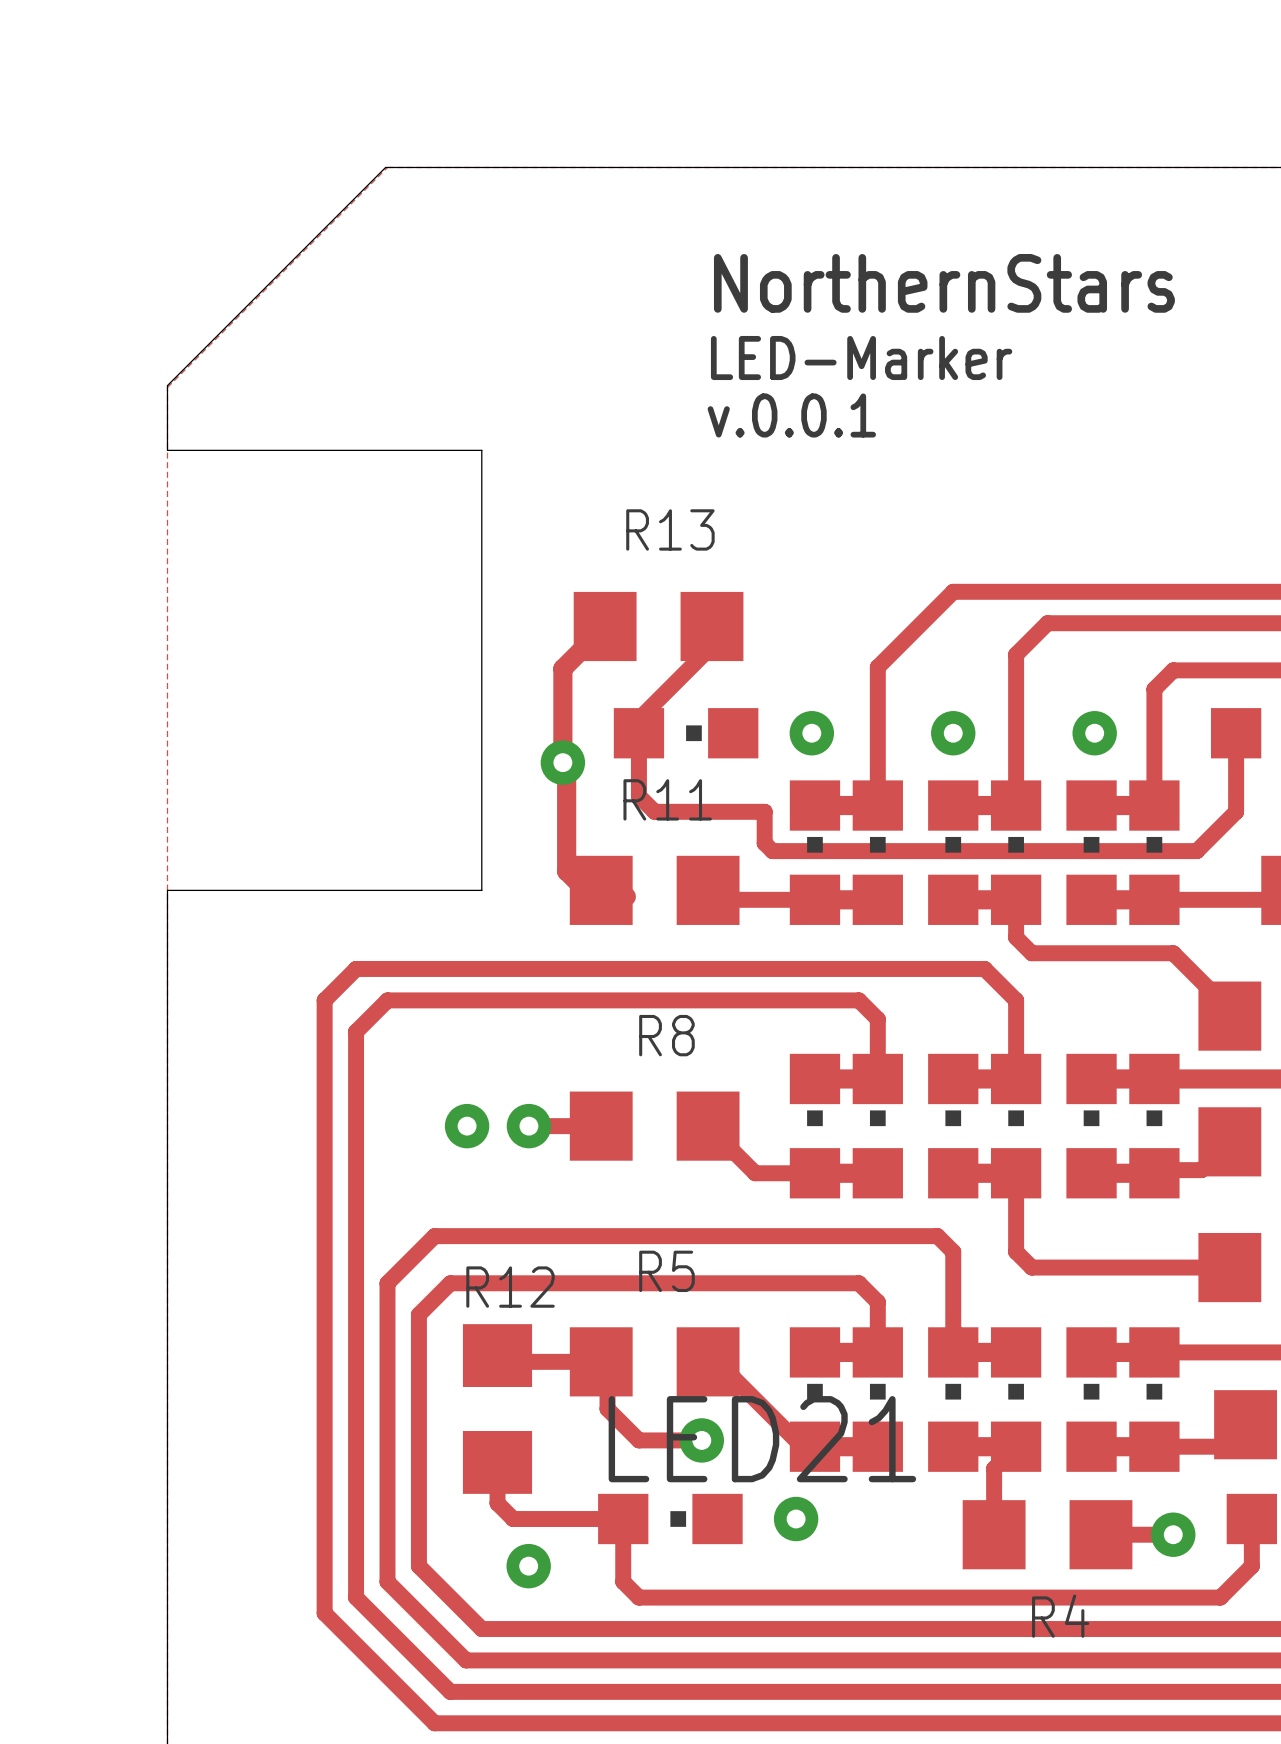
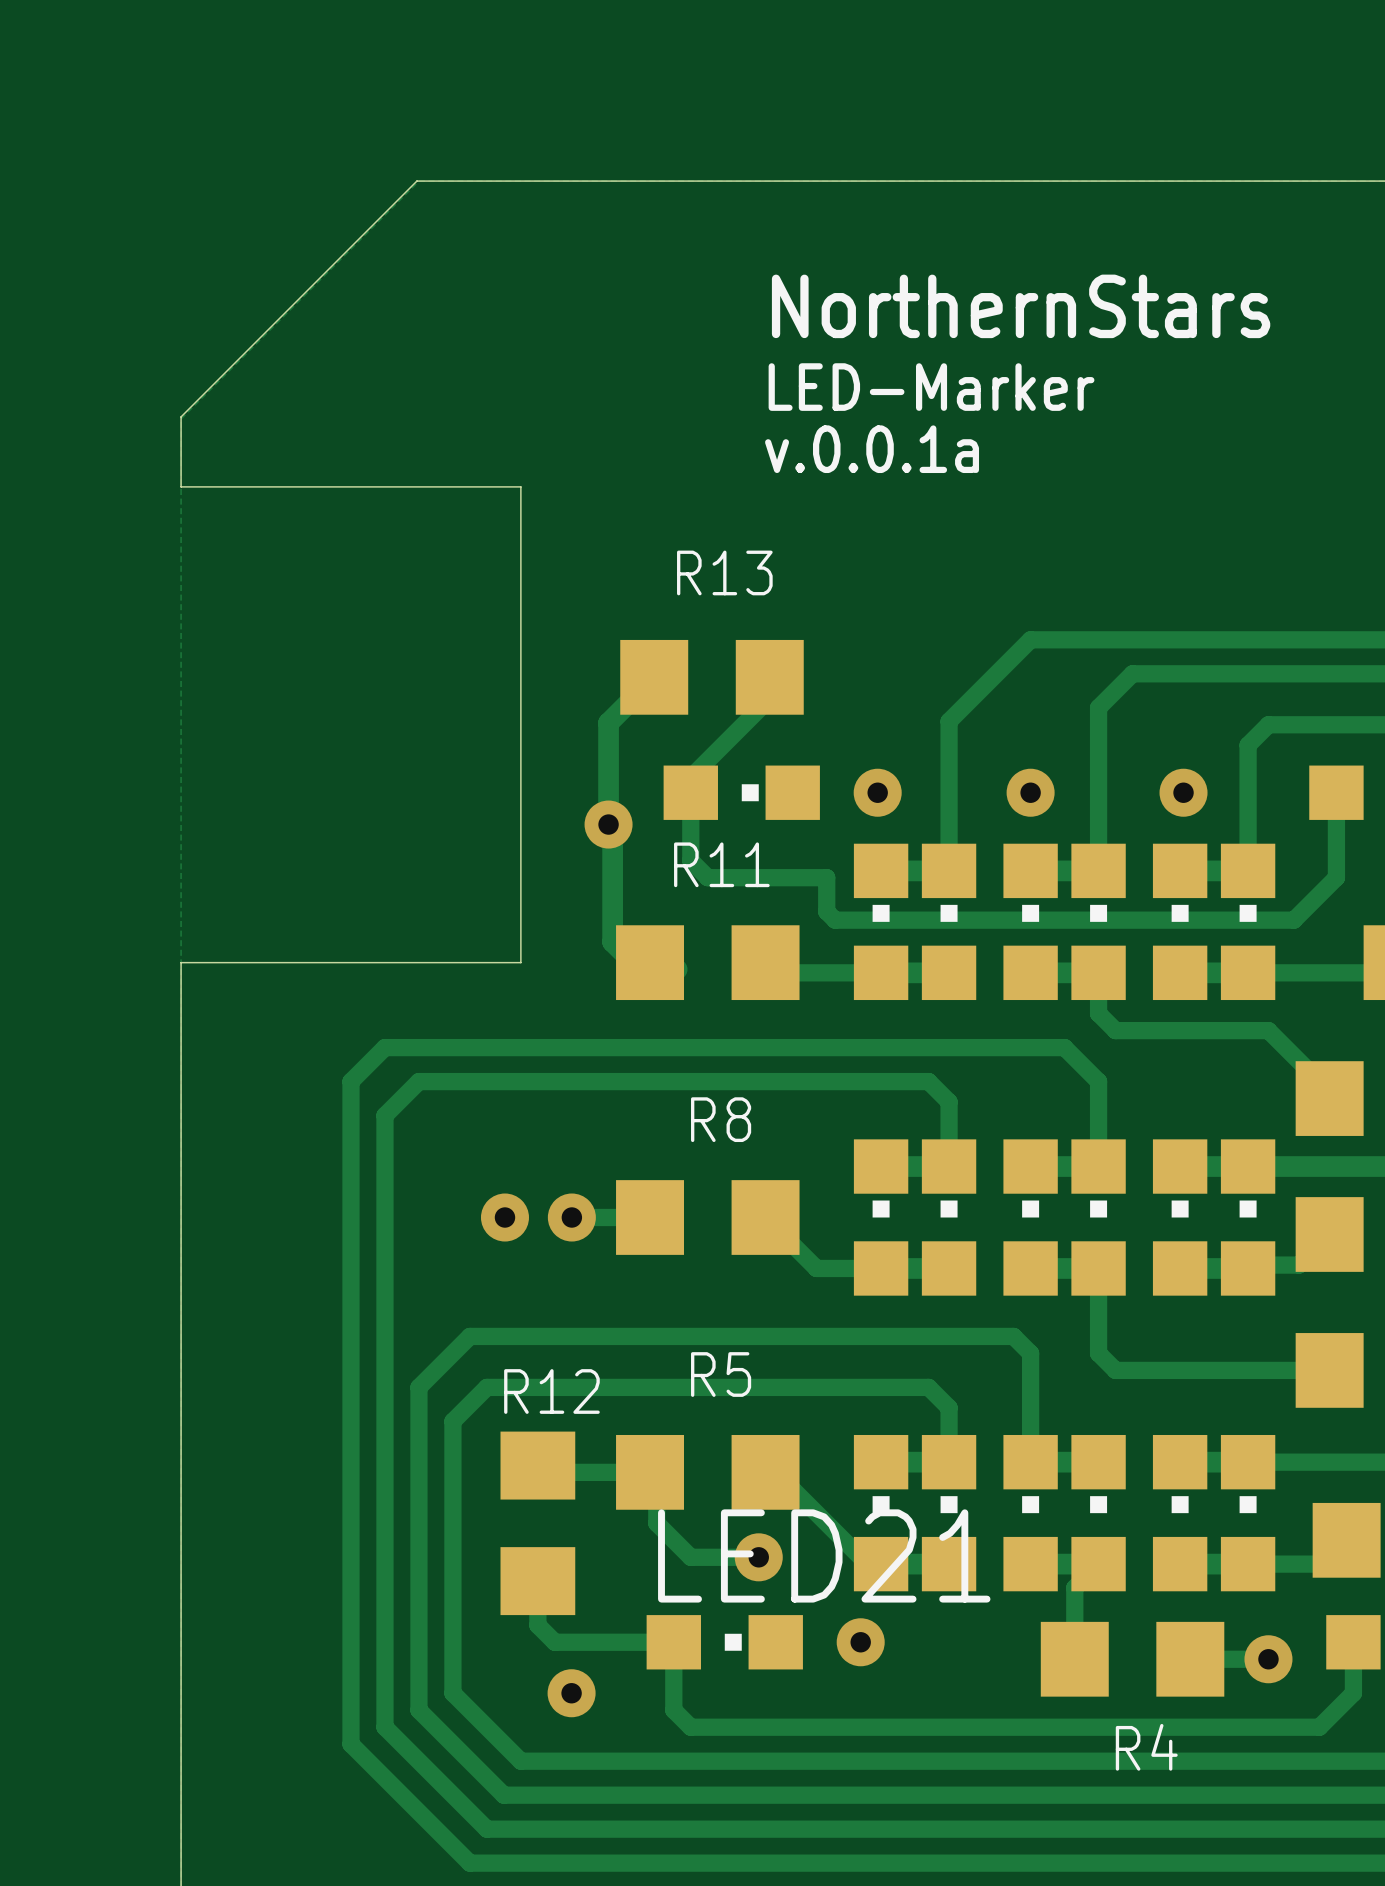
text: v.0.0.1 (791, 415) -> v.0.0.1a (872, 449)

